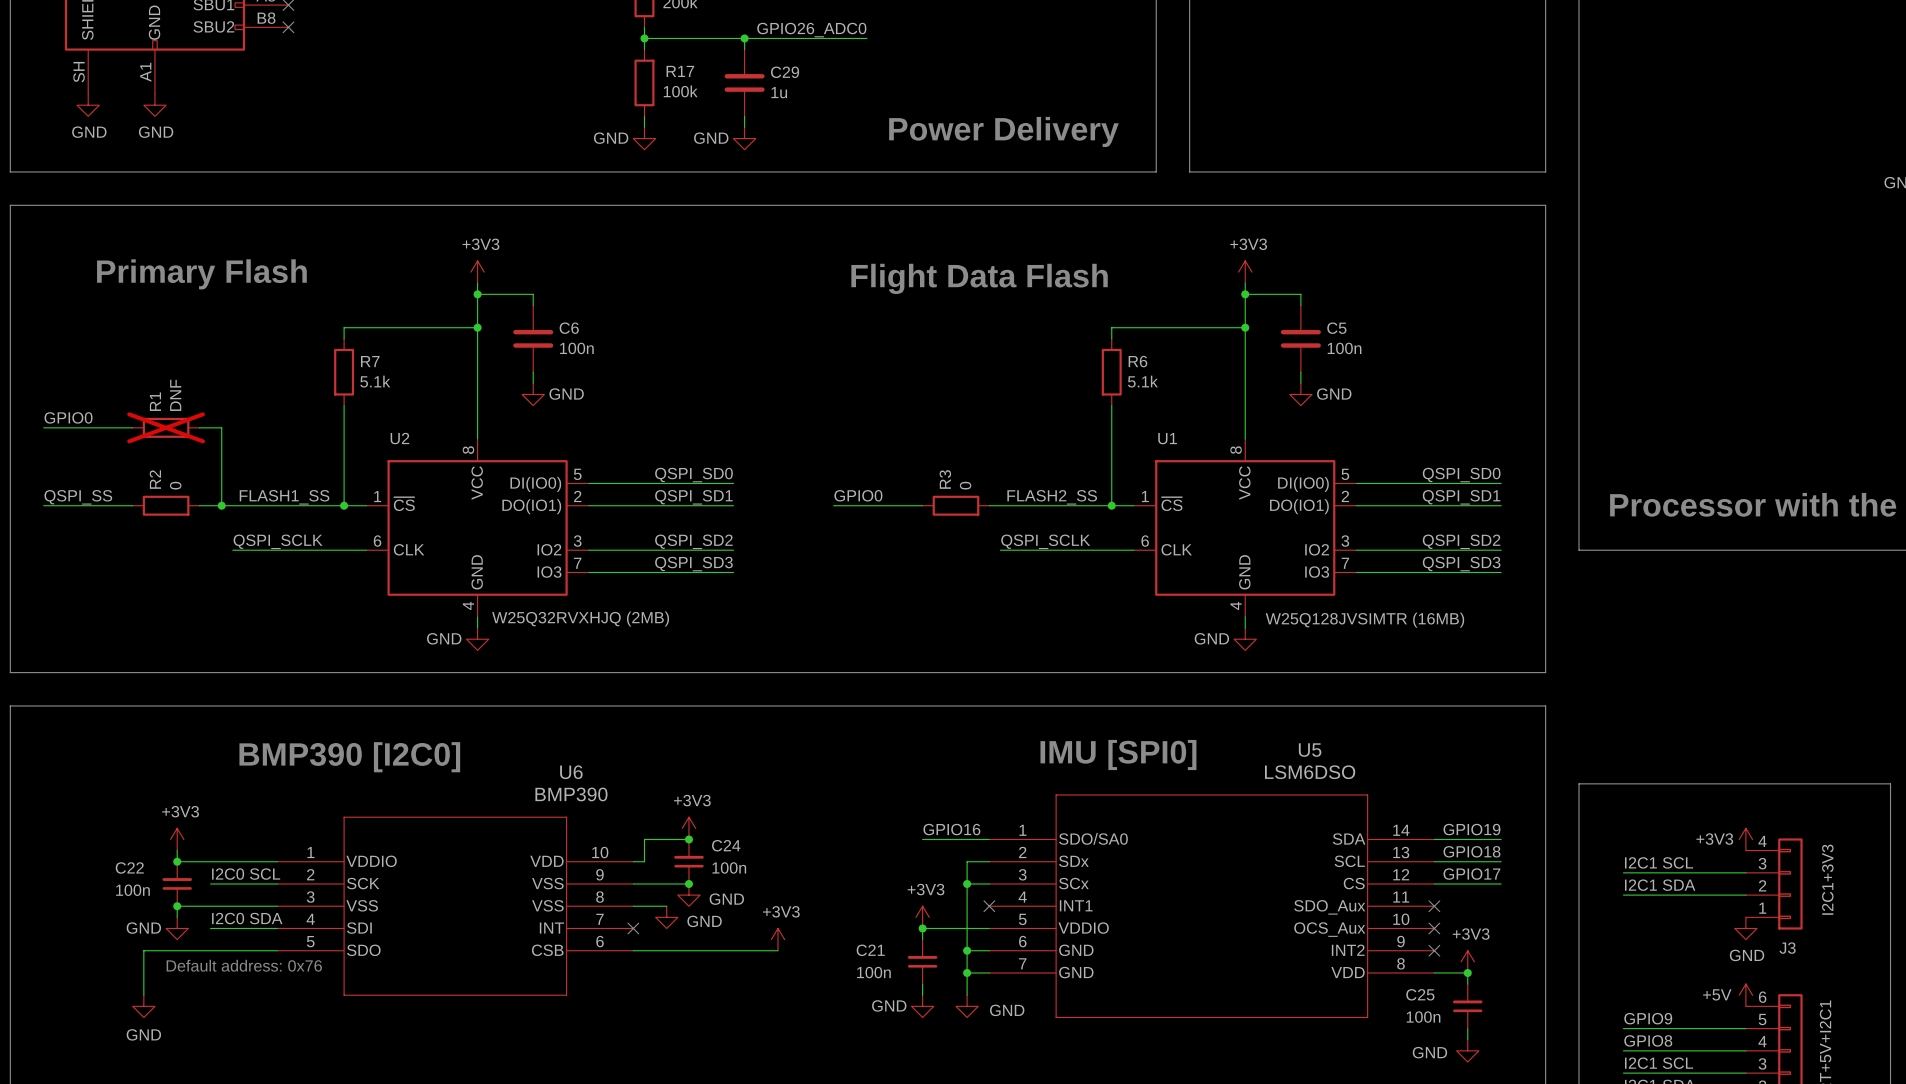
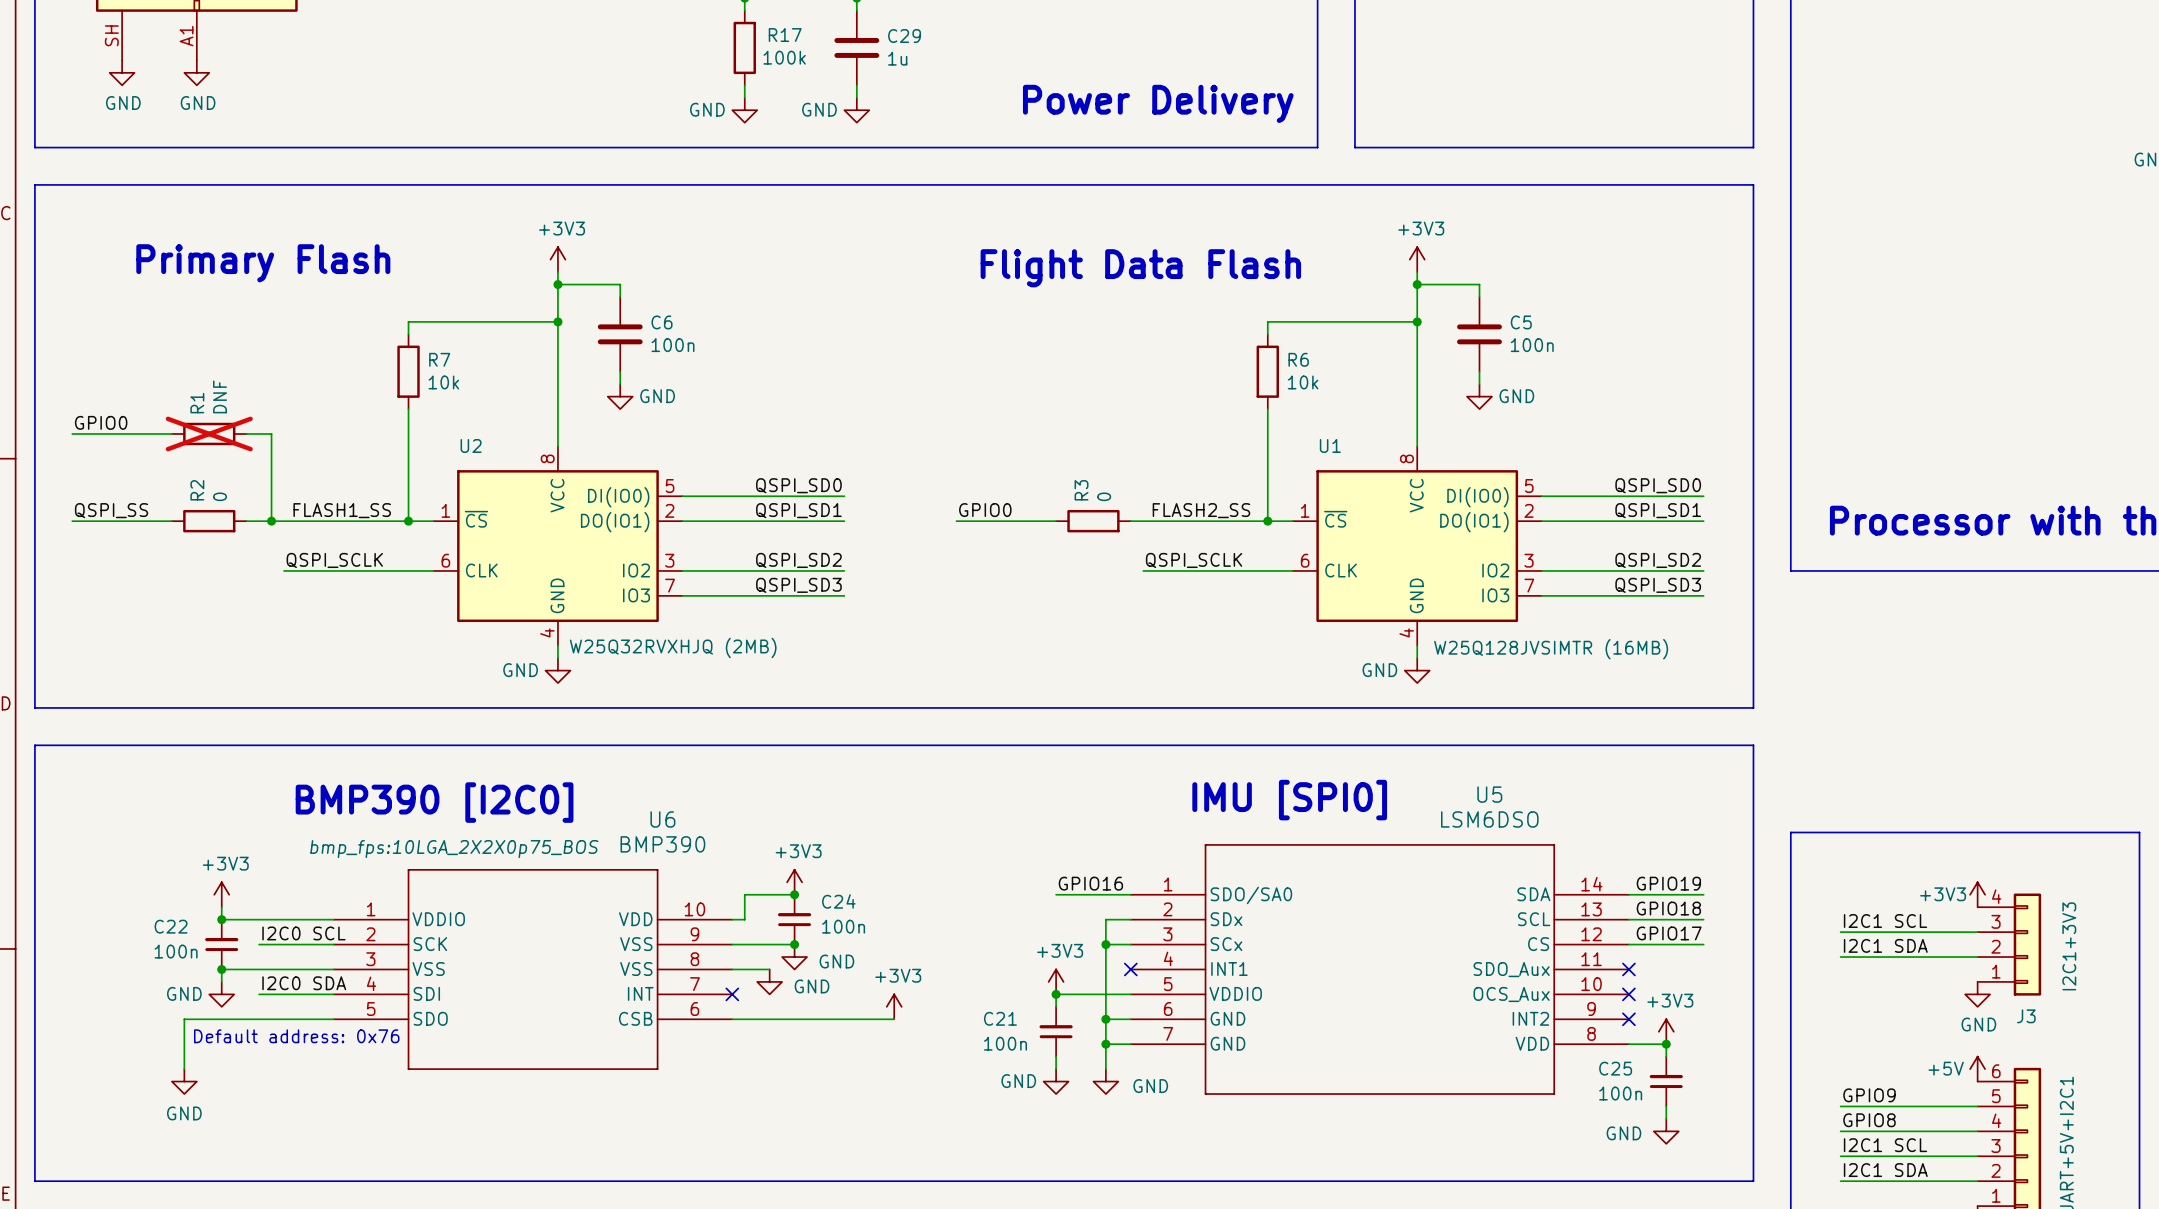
R7 value: 5.1k (375, 381) -> 10k (443, 382)
R6 value: 5.1k (1142, 381) -> 10k (1303, 382)
U6 text: none -> bmp_fps:10LGA_2X2X0p75_BOS (454, 849)

